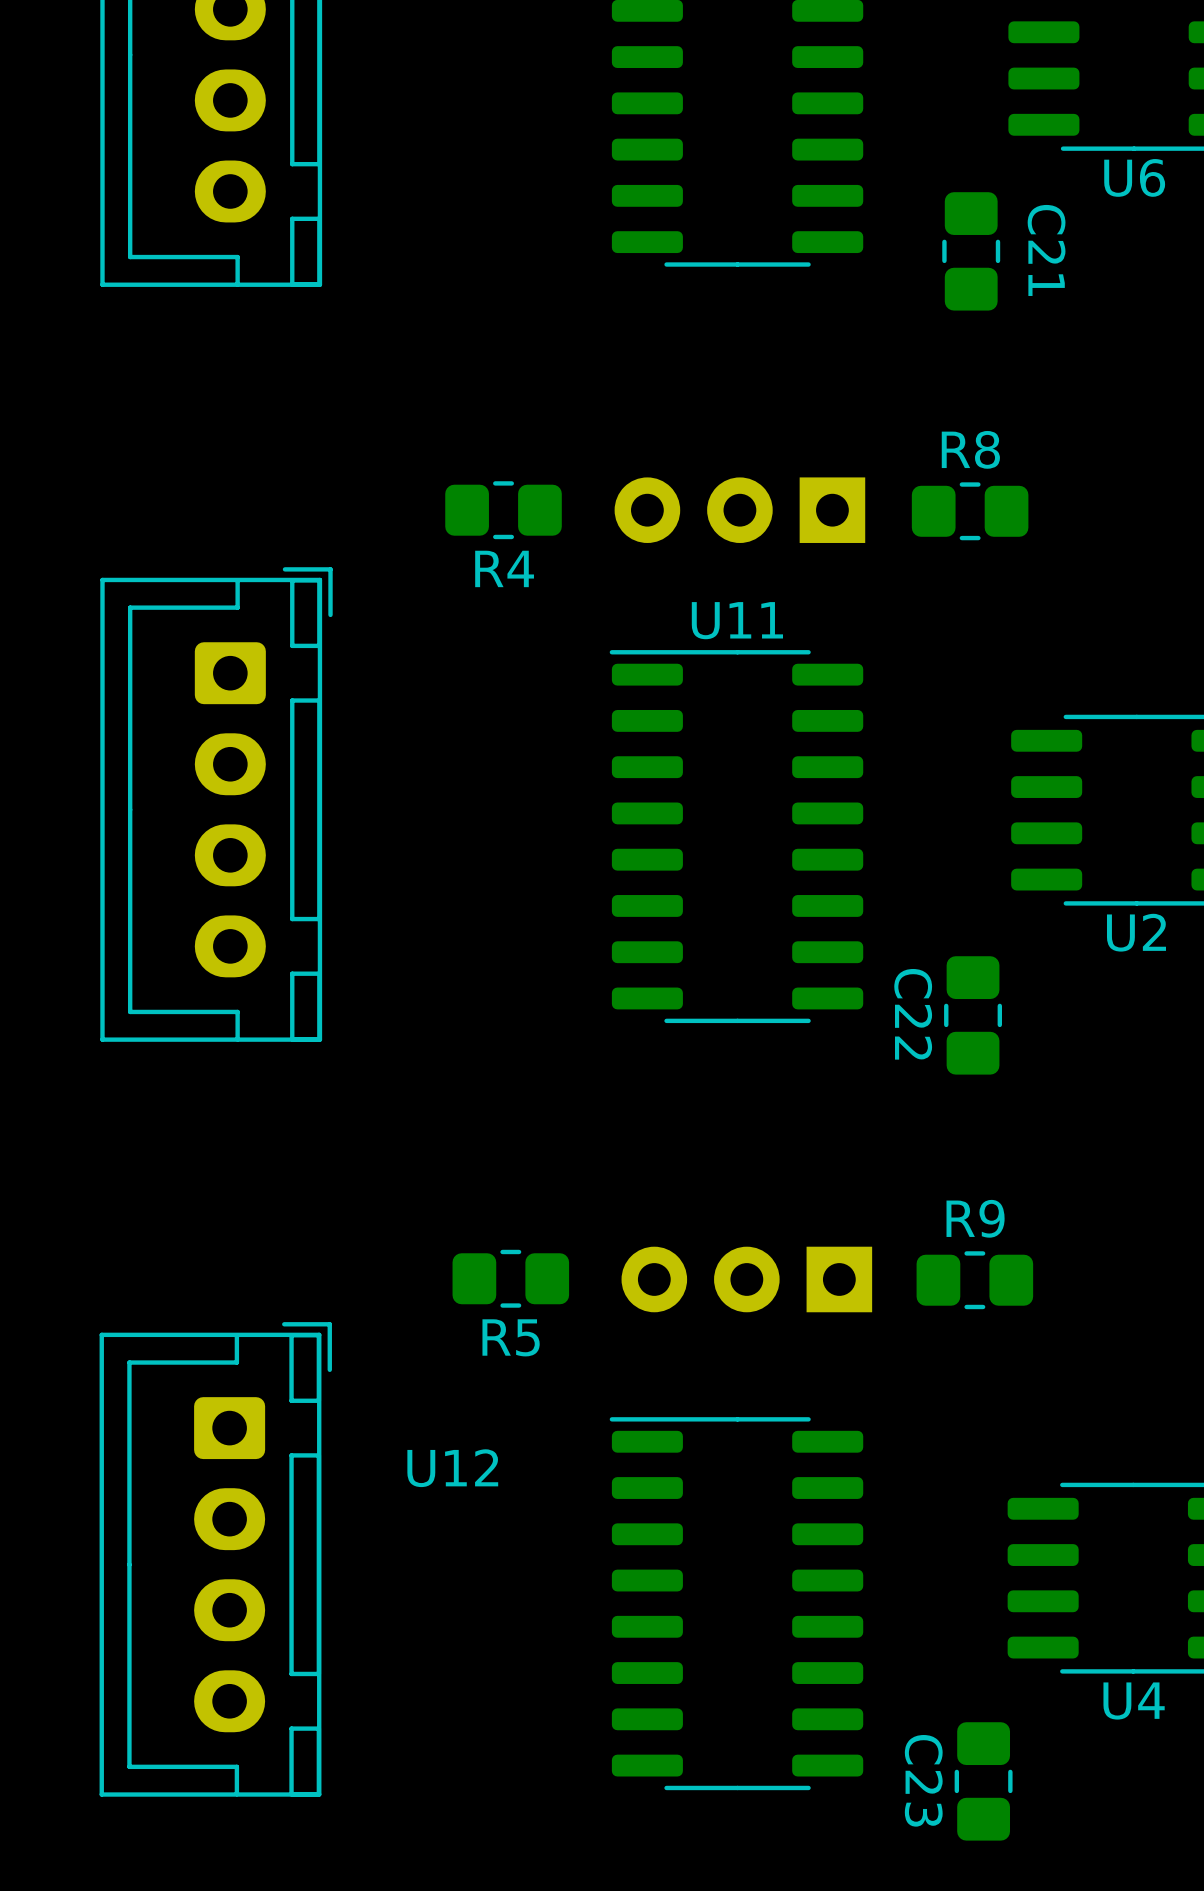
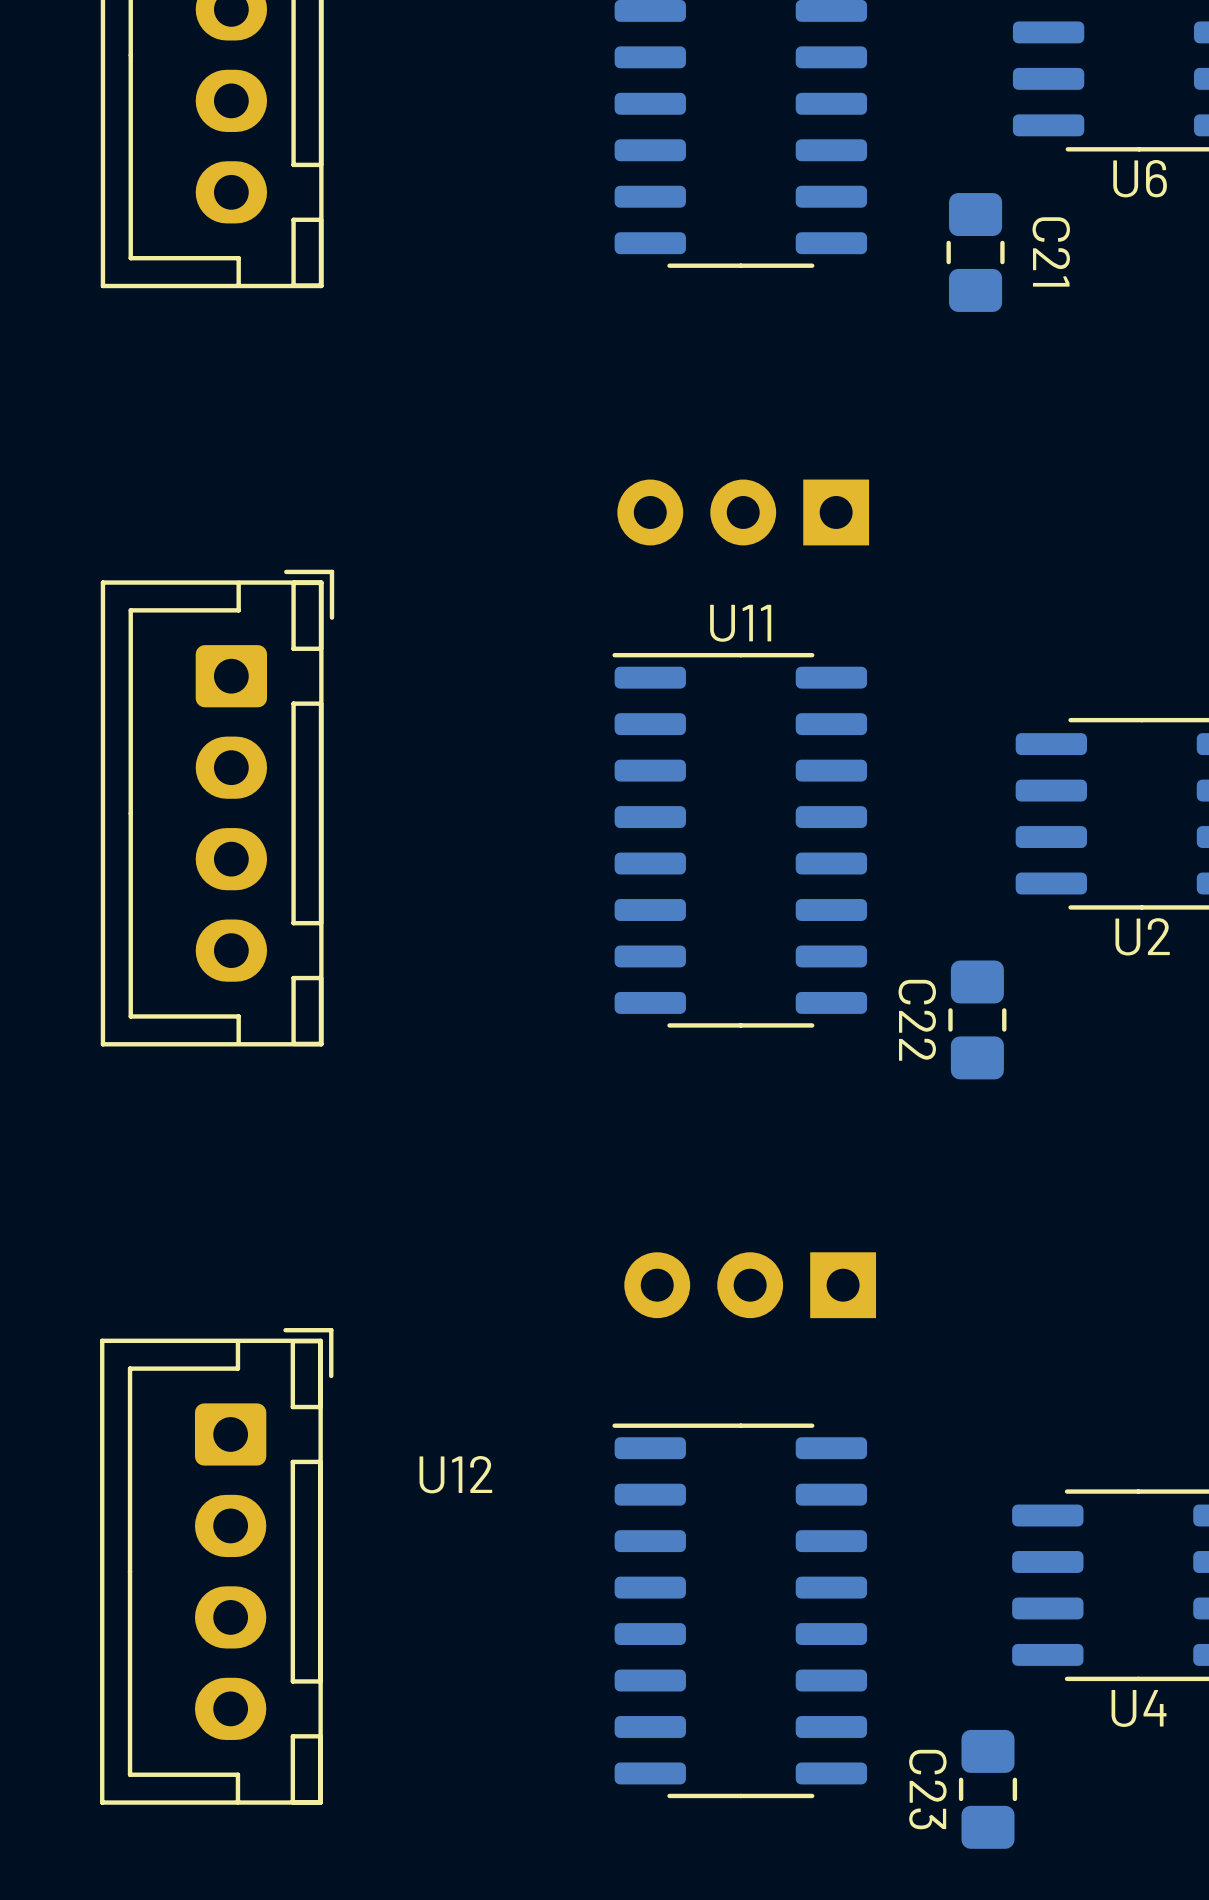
R4: (503, 510) -> none
R8: (970, 511) -> none
R5: (510, 1278) -> none
R9: (974, 1280) -> none

